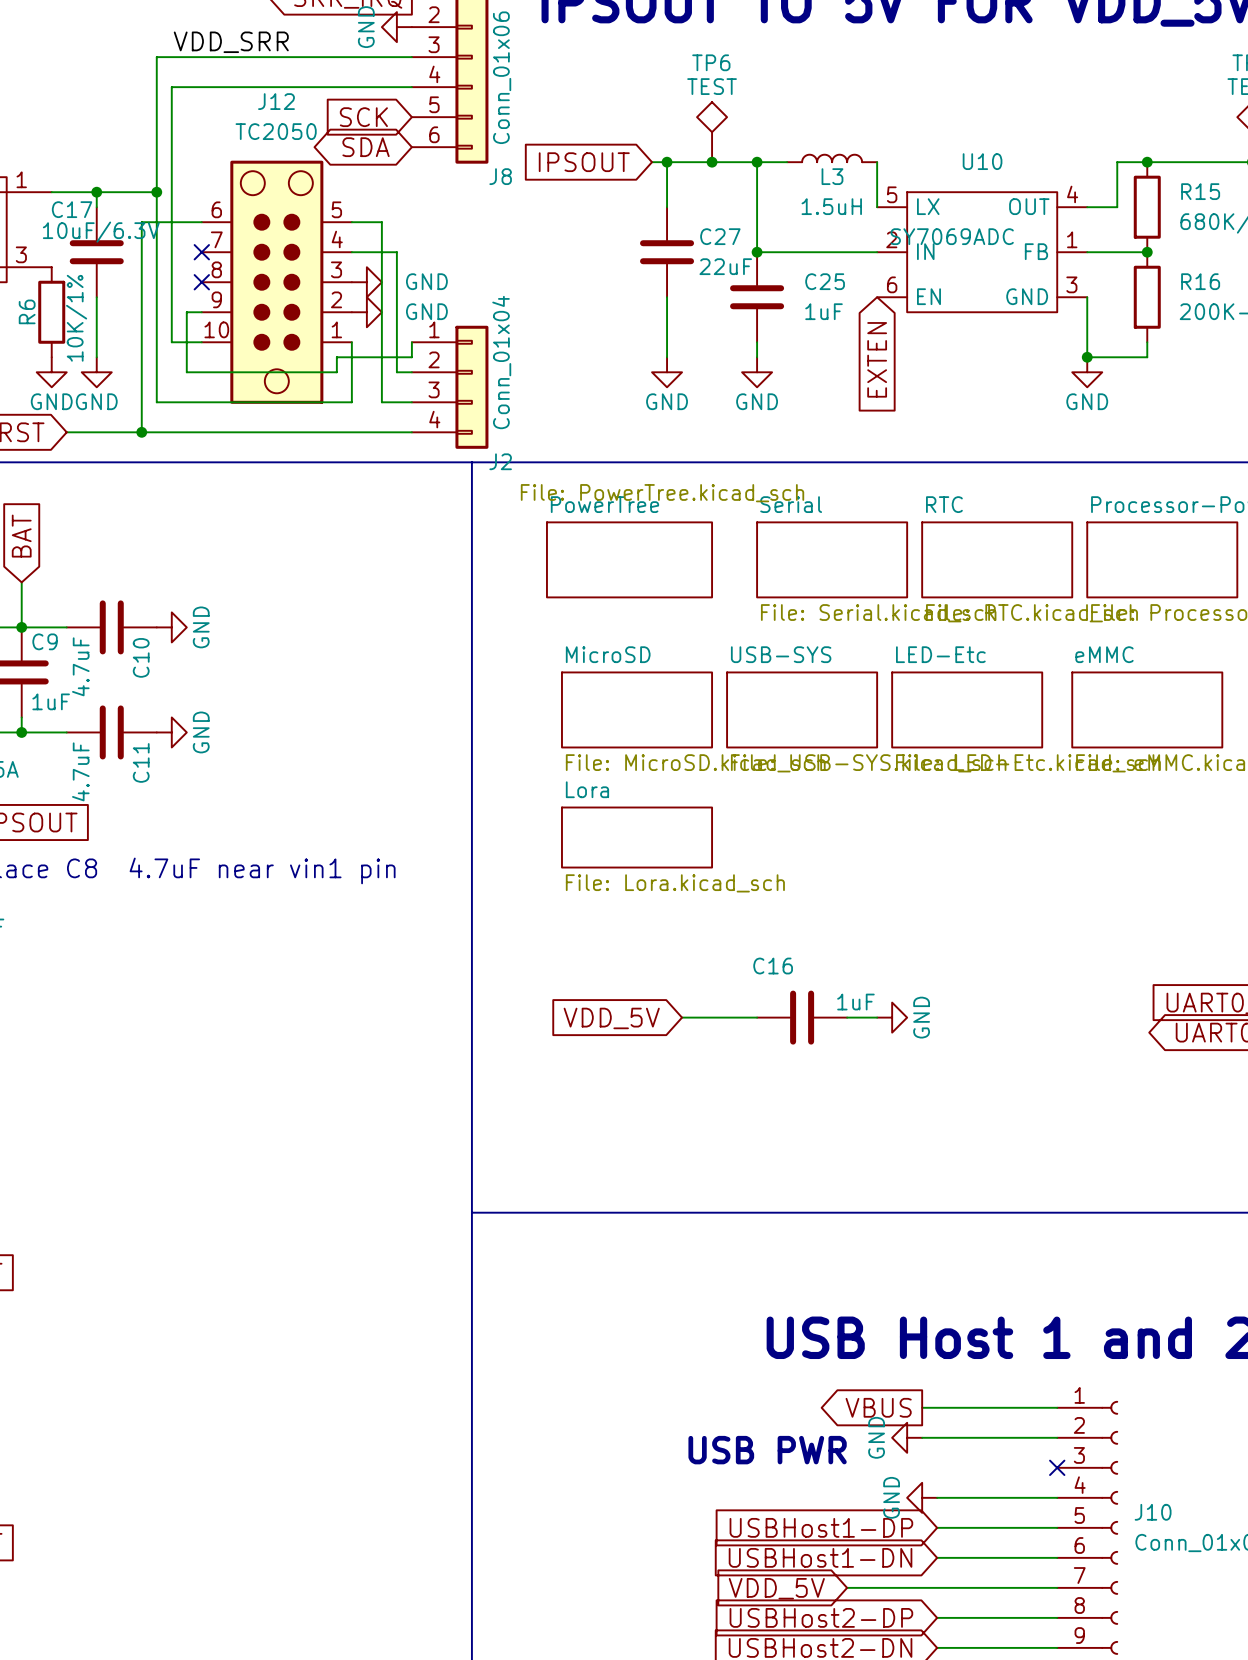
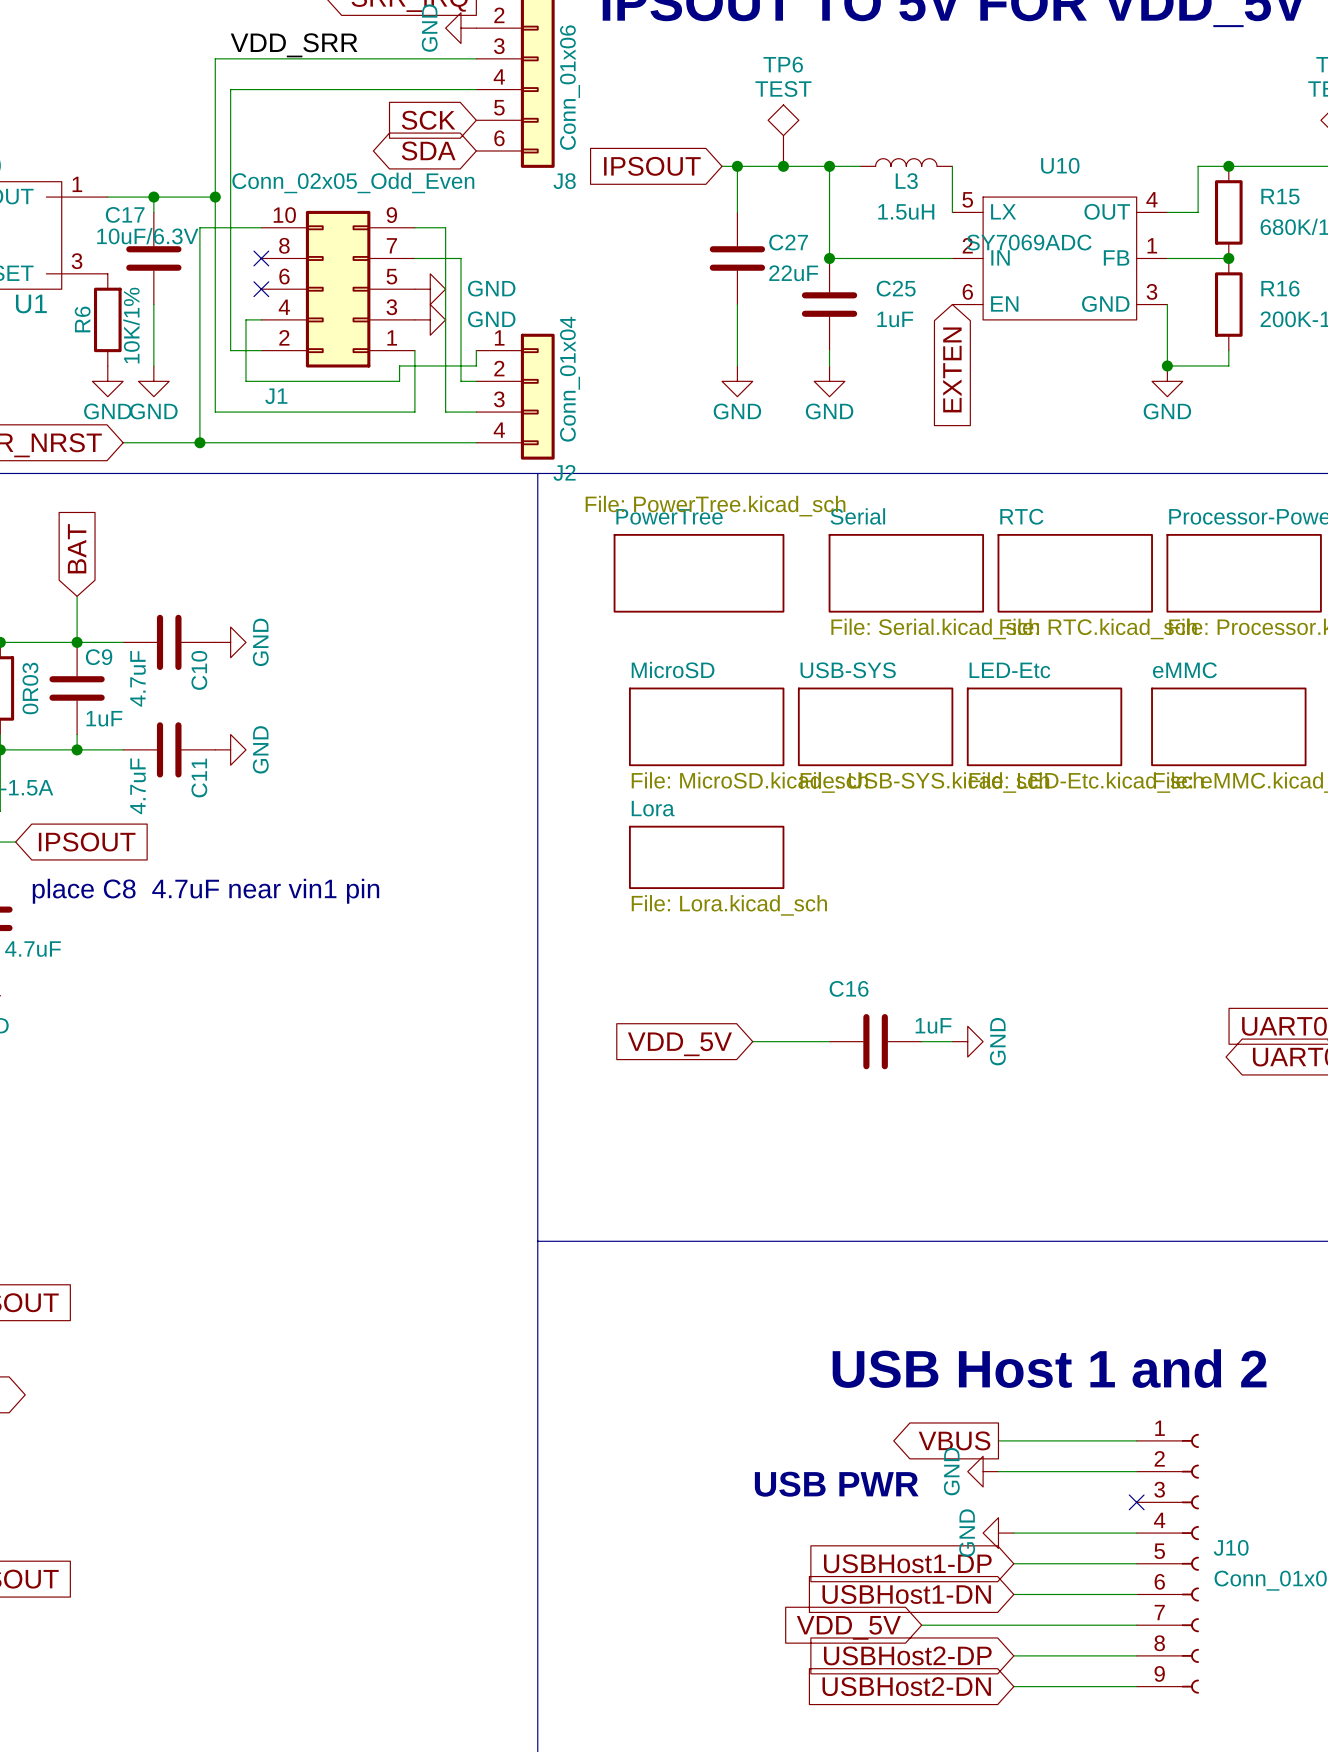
J12: TC2050 (276, 282) -> none
J1: none -> Conn_02x05_Odd_Even (338, 289)

